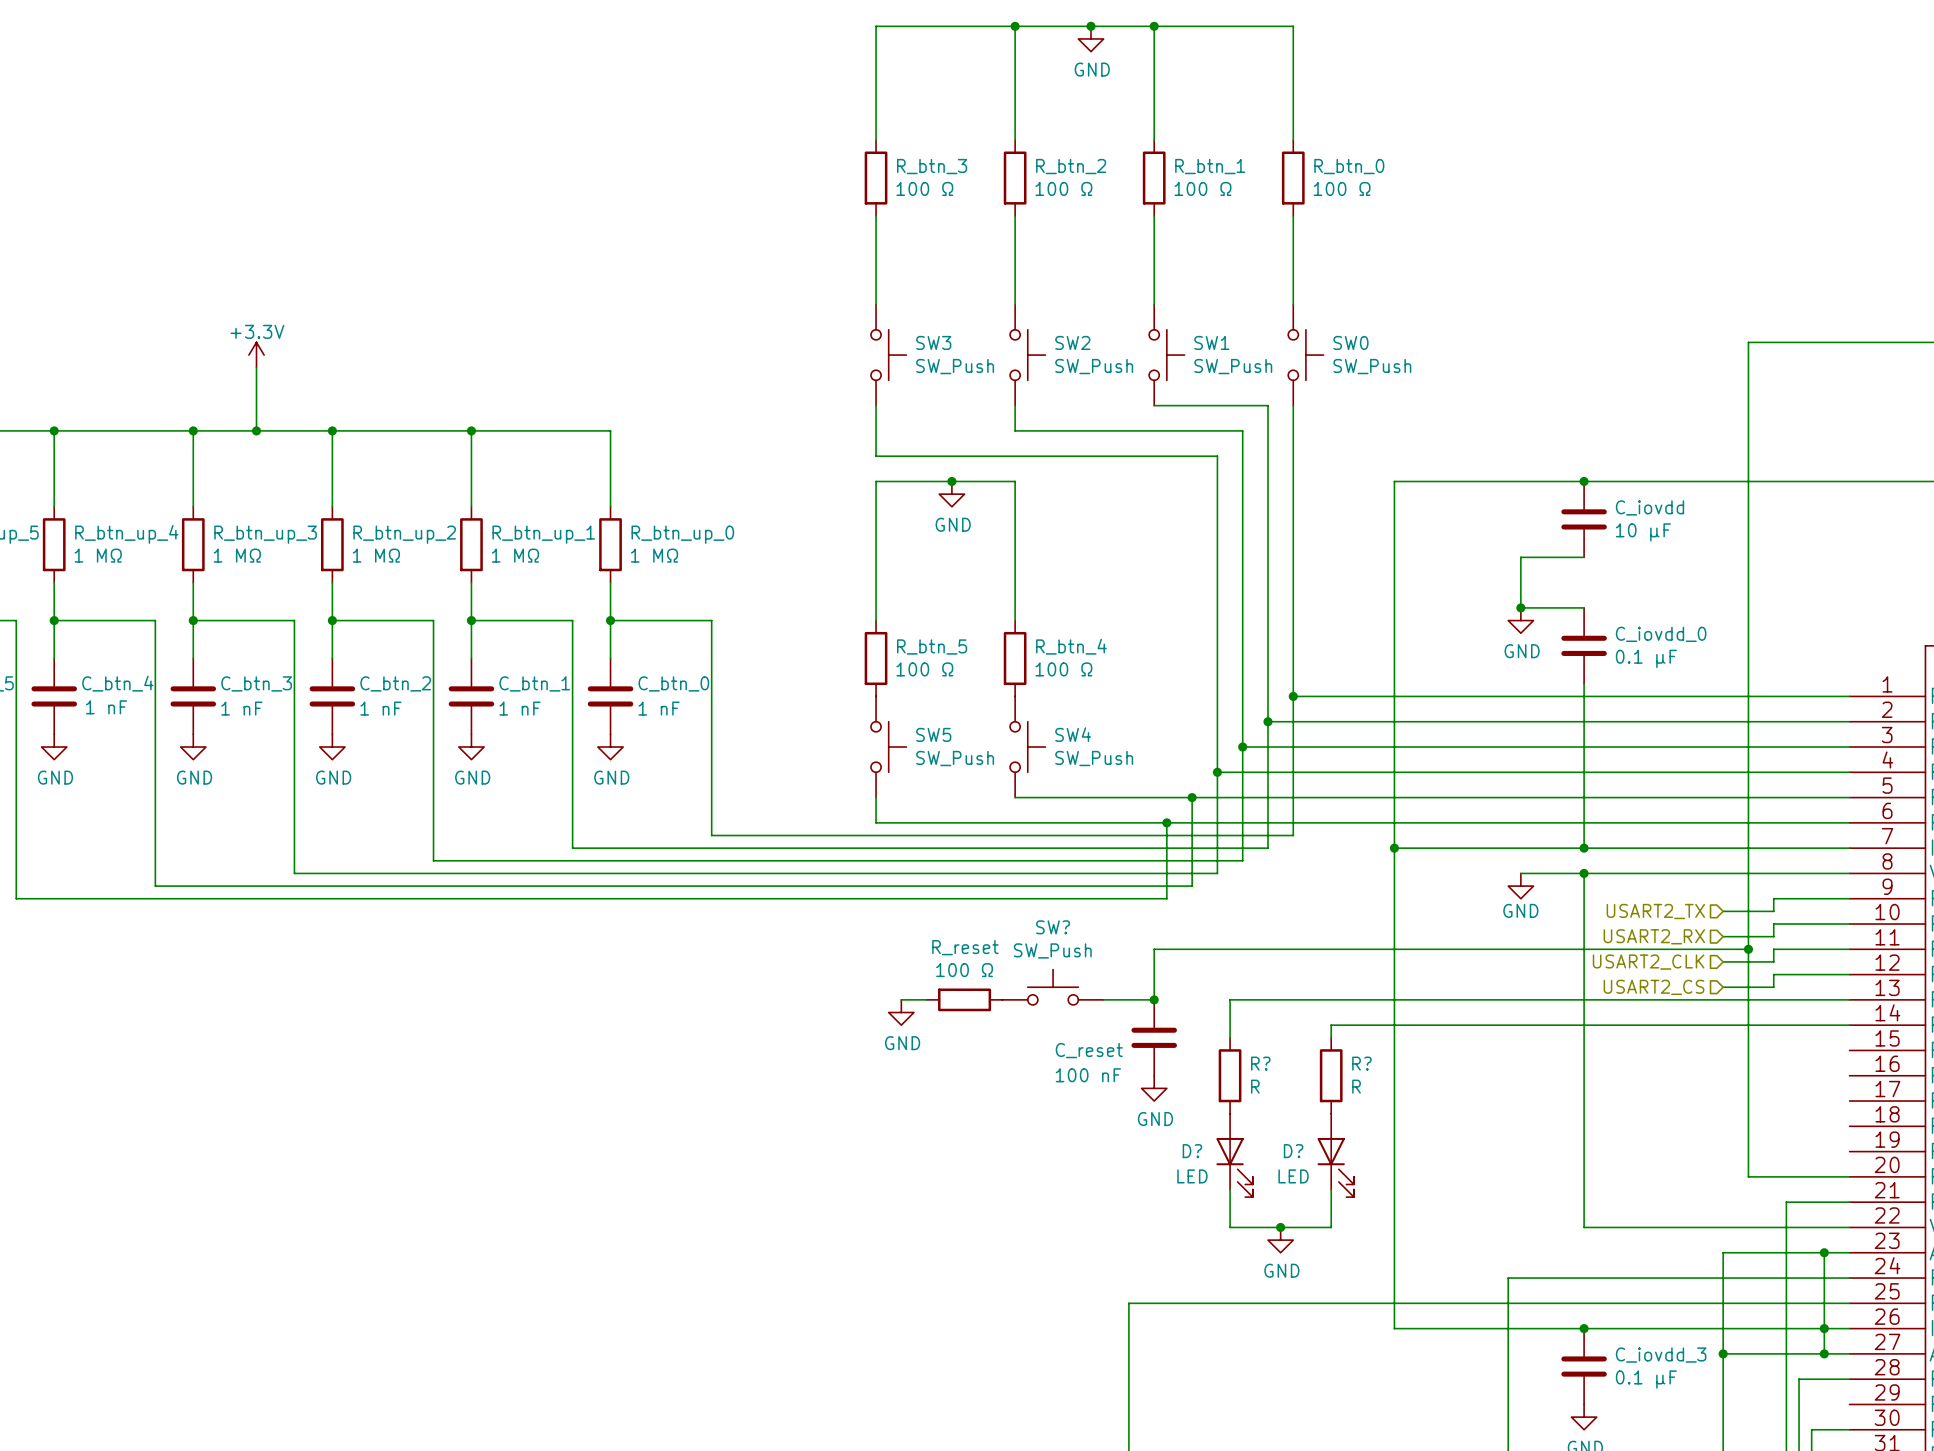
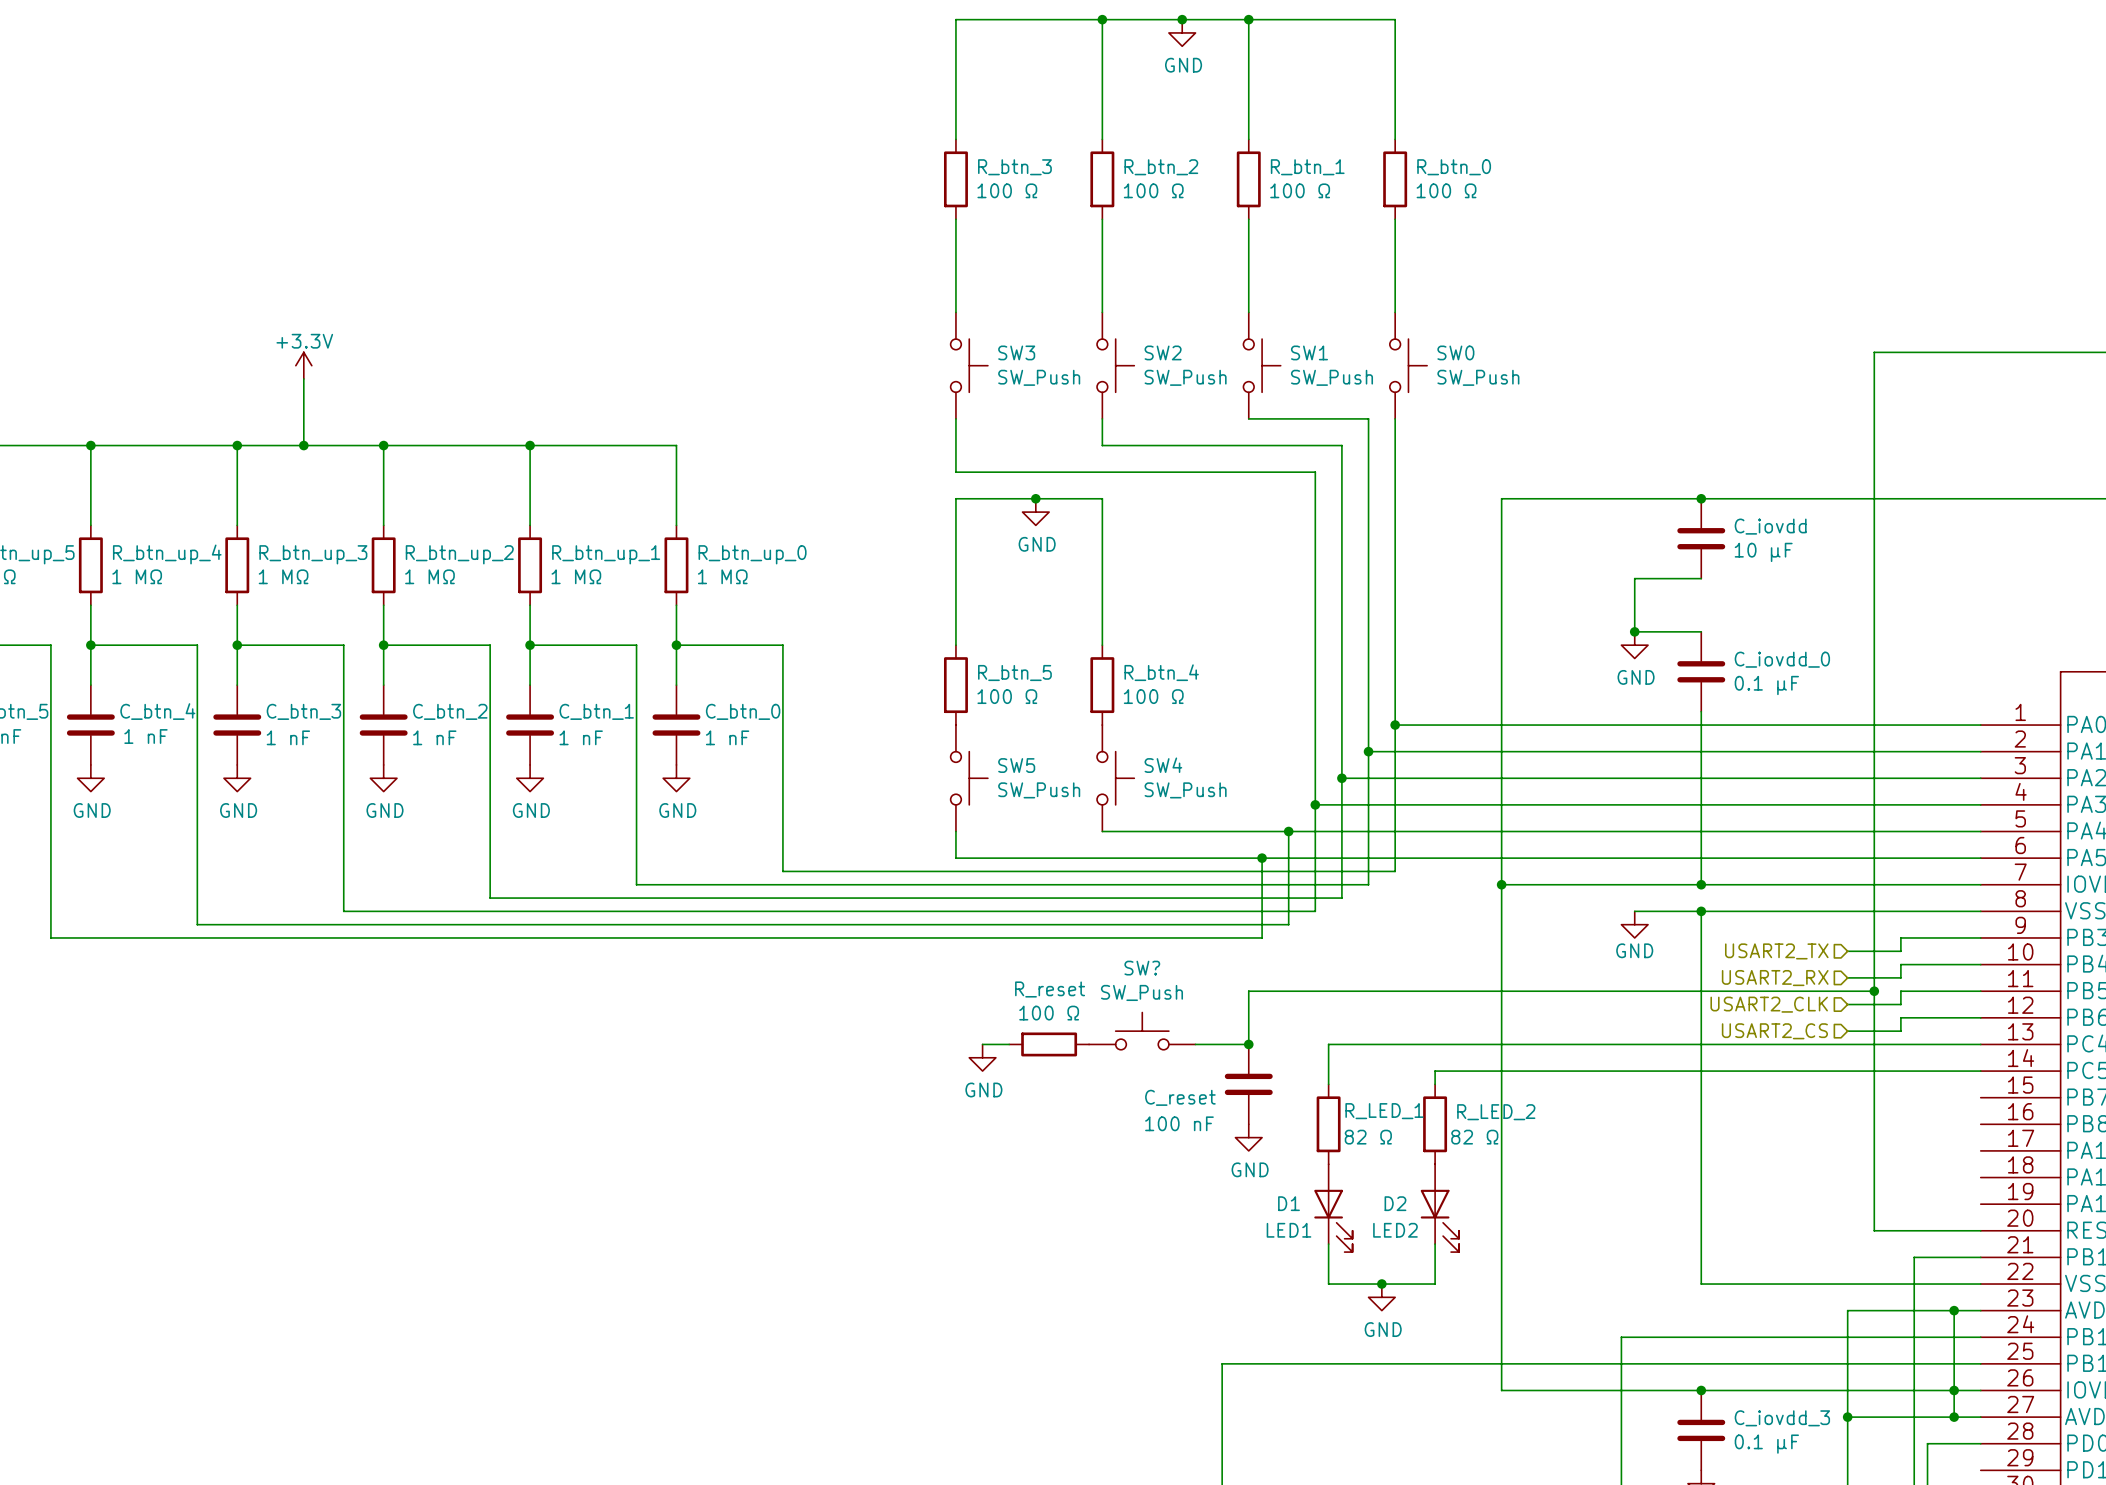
R? name: R? (1260, 1063) -> R_LED_1 (1384, 1111)
R? name: R? (1361, 1063) -> R_LED_2 (1496, 1112)
R? value: R (1255, 1086) -> 82 Ω (1368, 1137)
R? value: R (1356, 1086) -> 82 Ω (1474, 1137)
D? name: D? (1192, 1151) -> D1 (1289, 1203)
D? name: D? (1293, 1151) -> D2 (1395, 1203)
D? value: LED (1192, 1176) -> LED1 (1289, 1230)
D? value: LED (1293, 1176) -> LED2 (1395, 1230)

